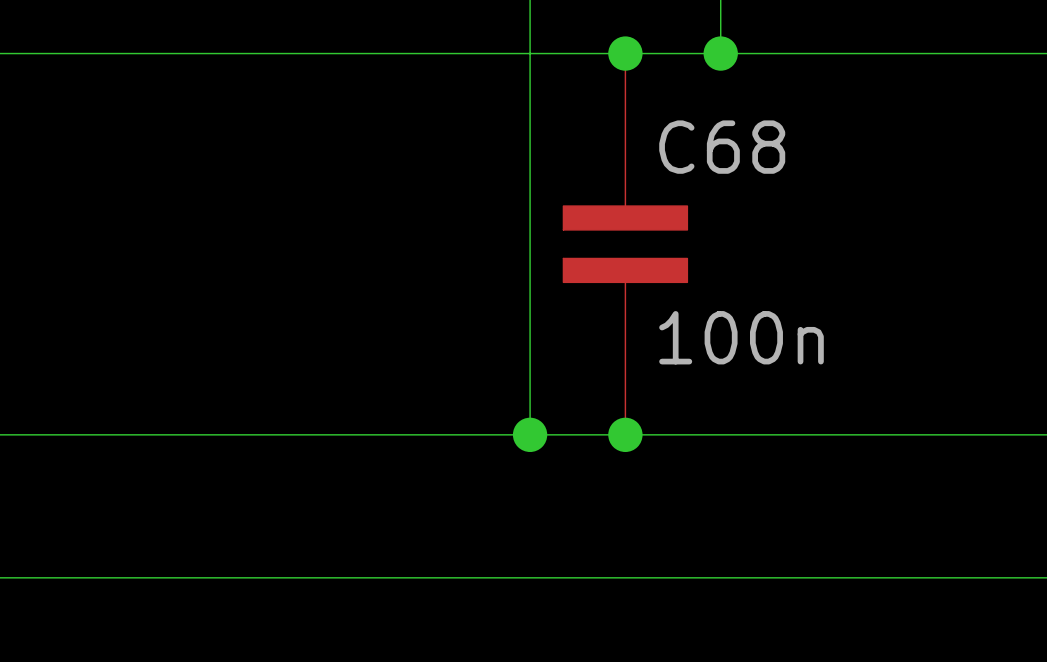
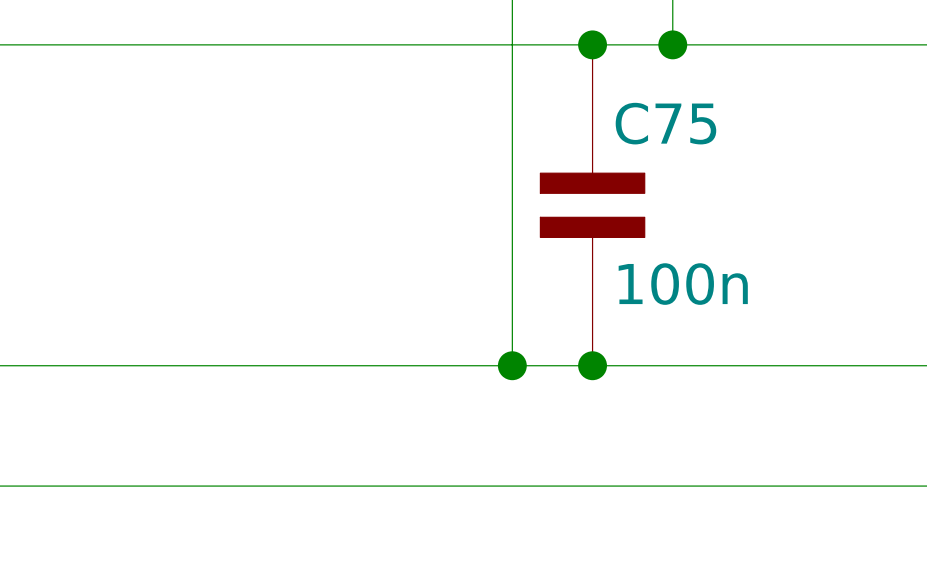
C68 name: C68 (722, 147) -> C75 (665, 123)

